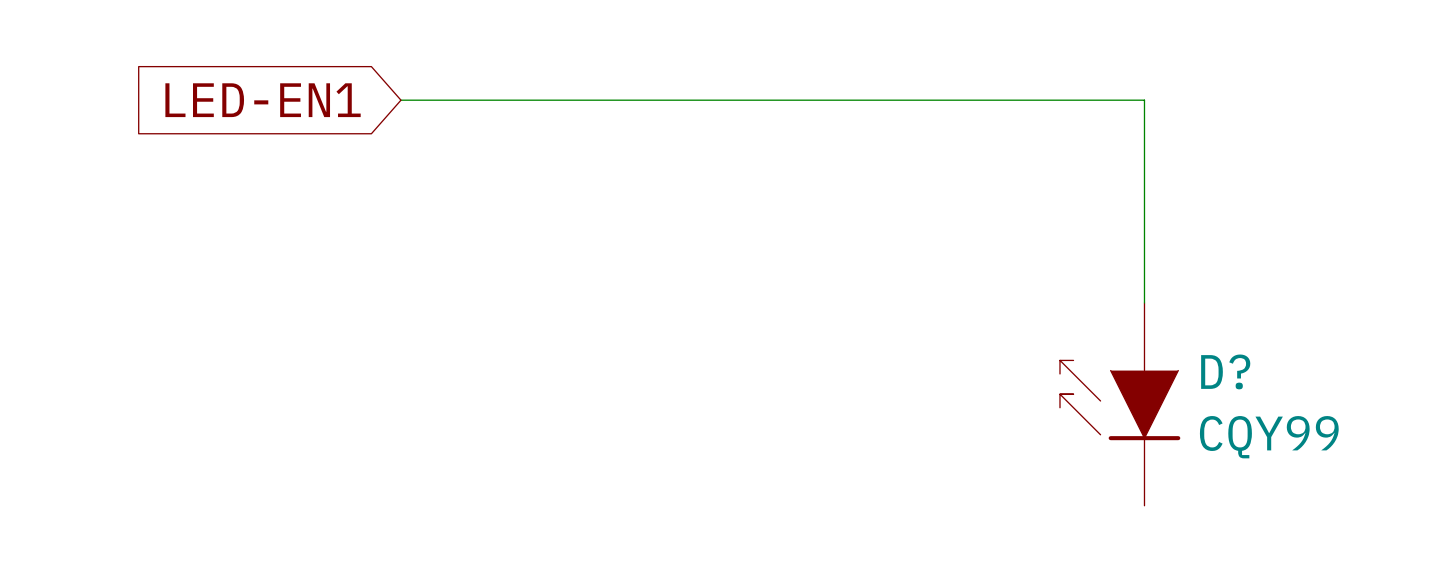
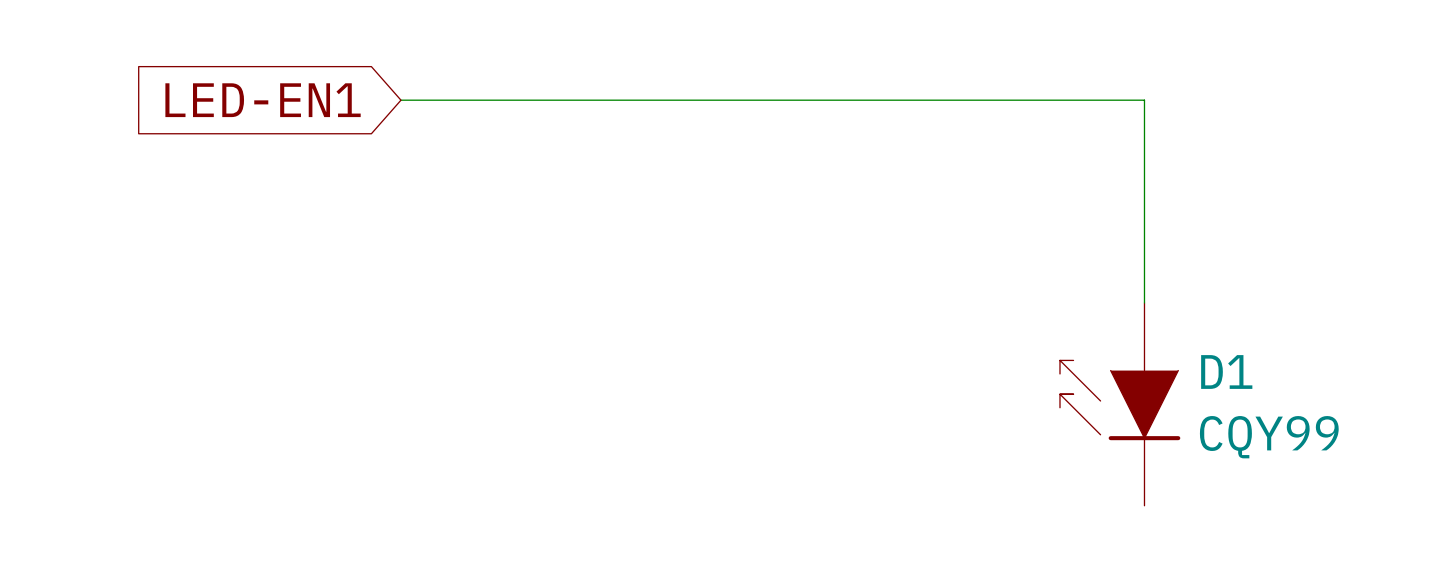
D? name: D? (1225, 371) -> D1 (1226, 371)

